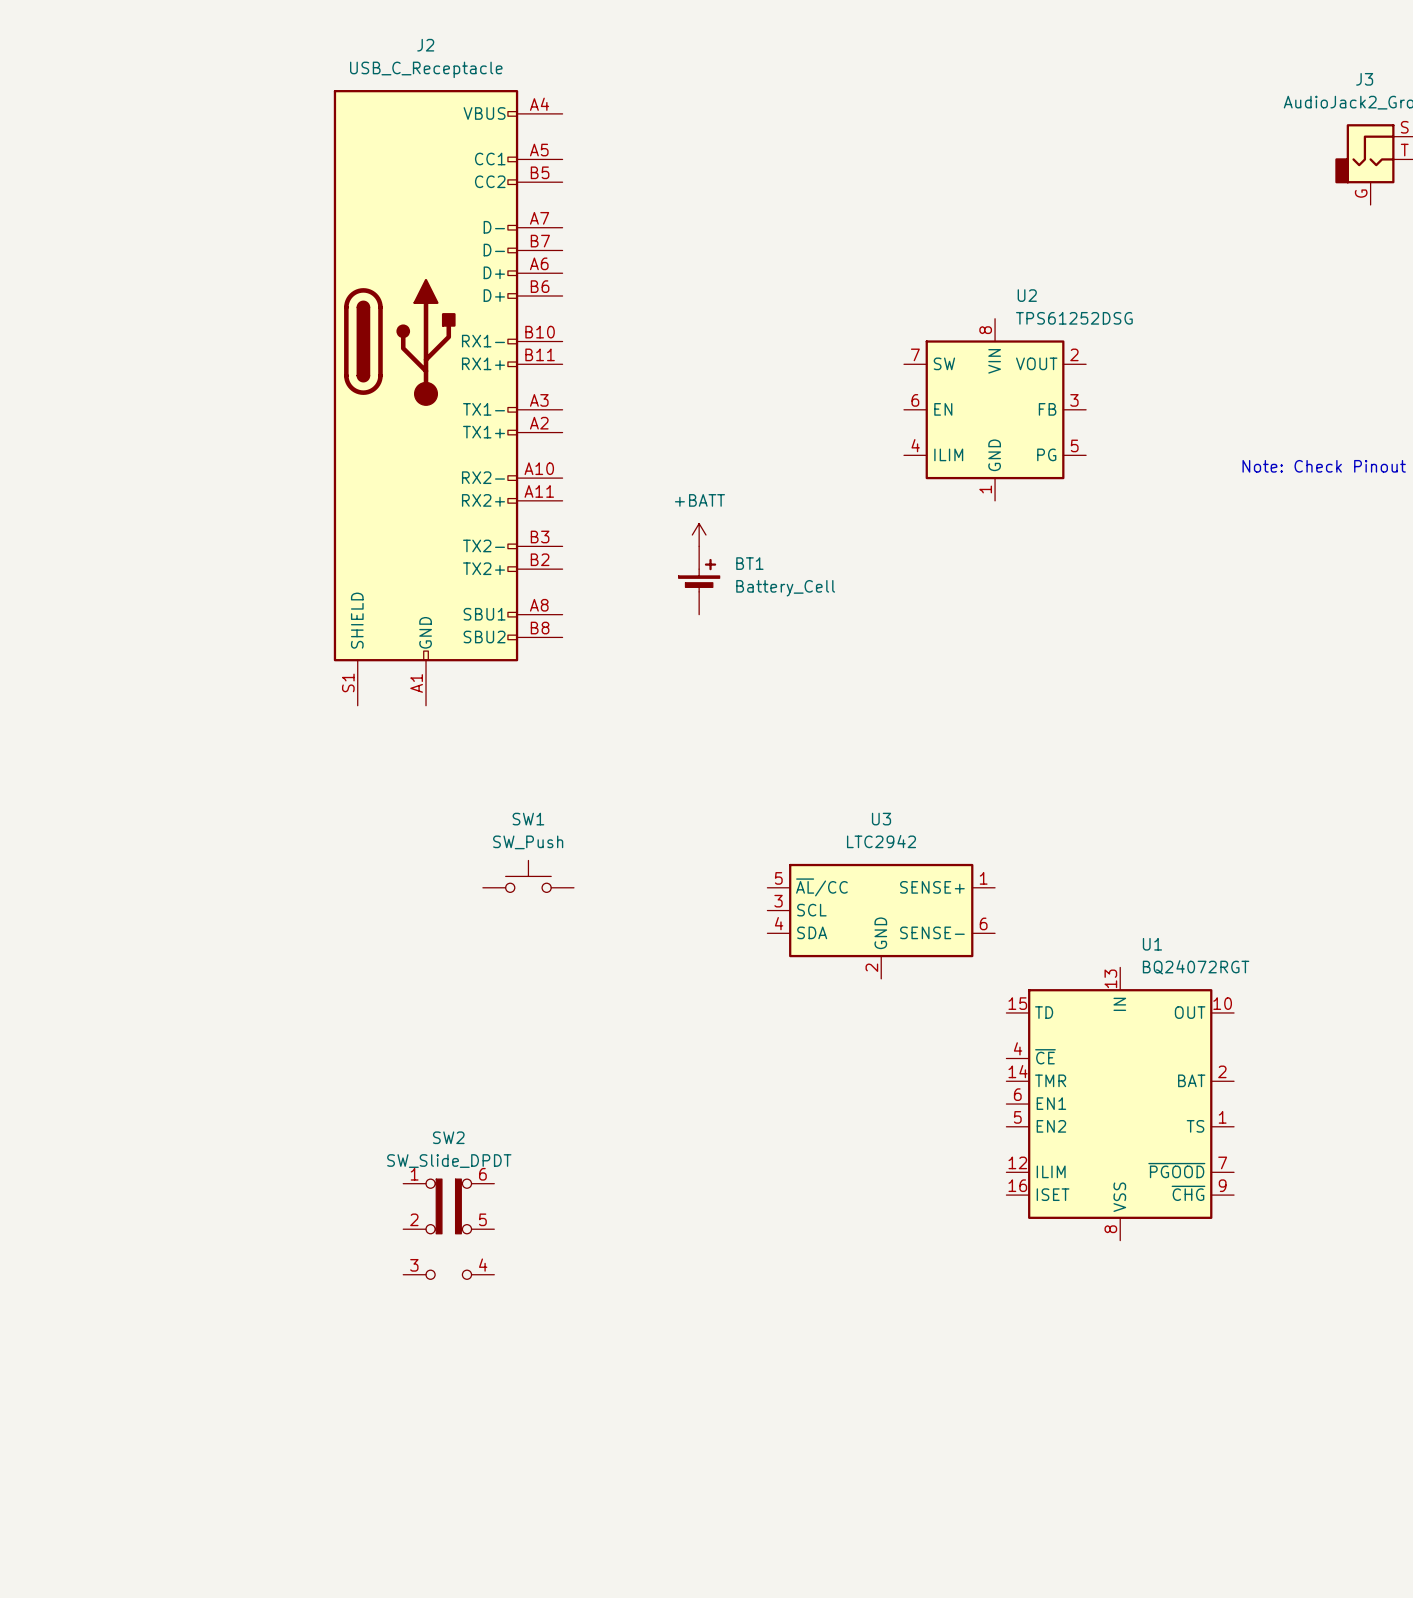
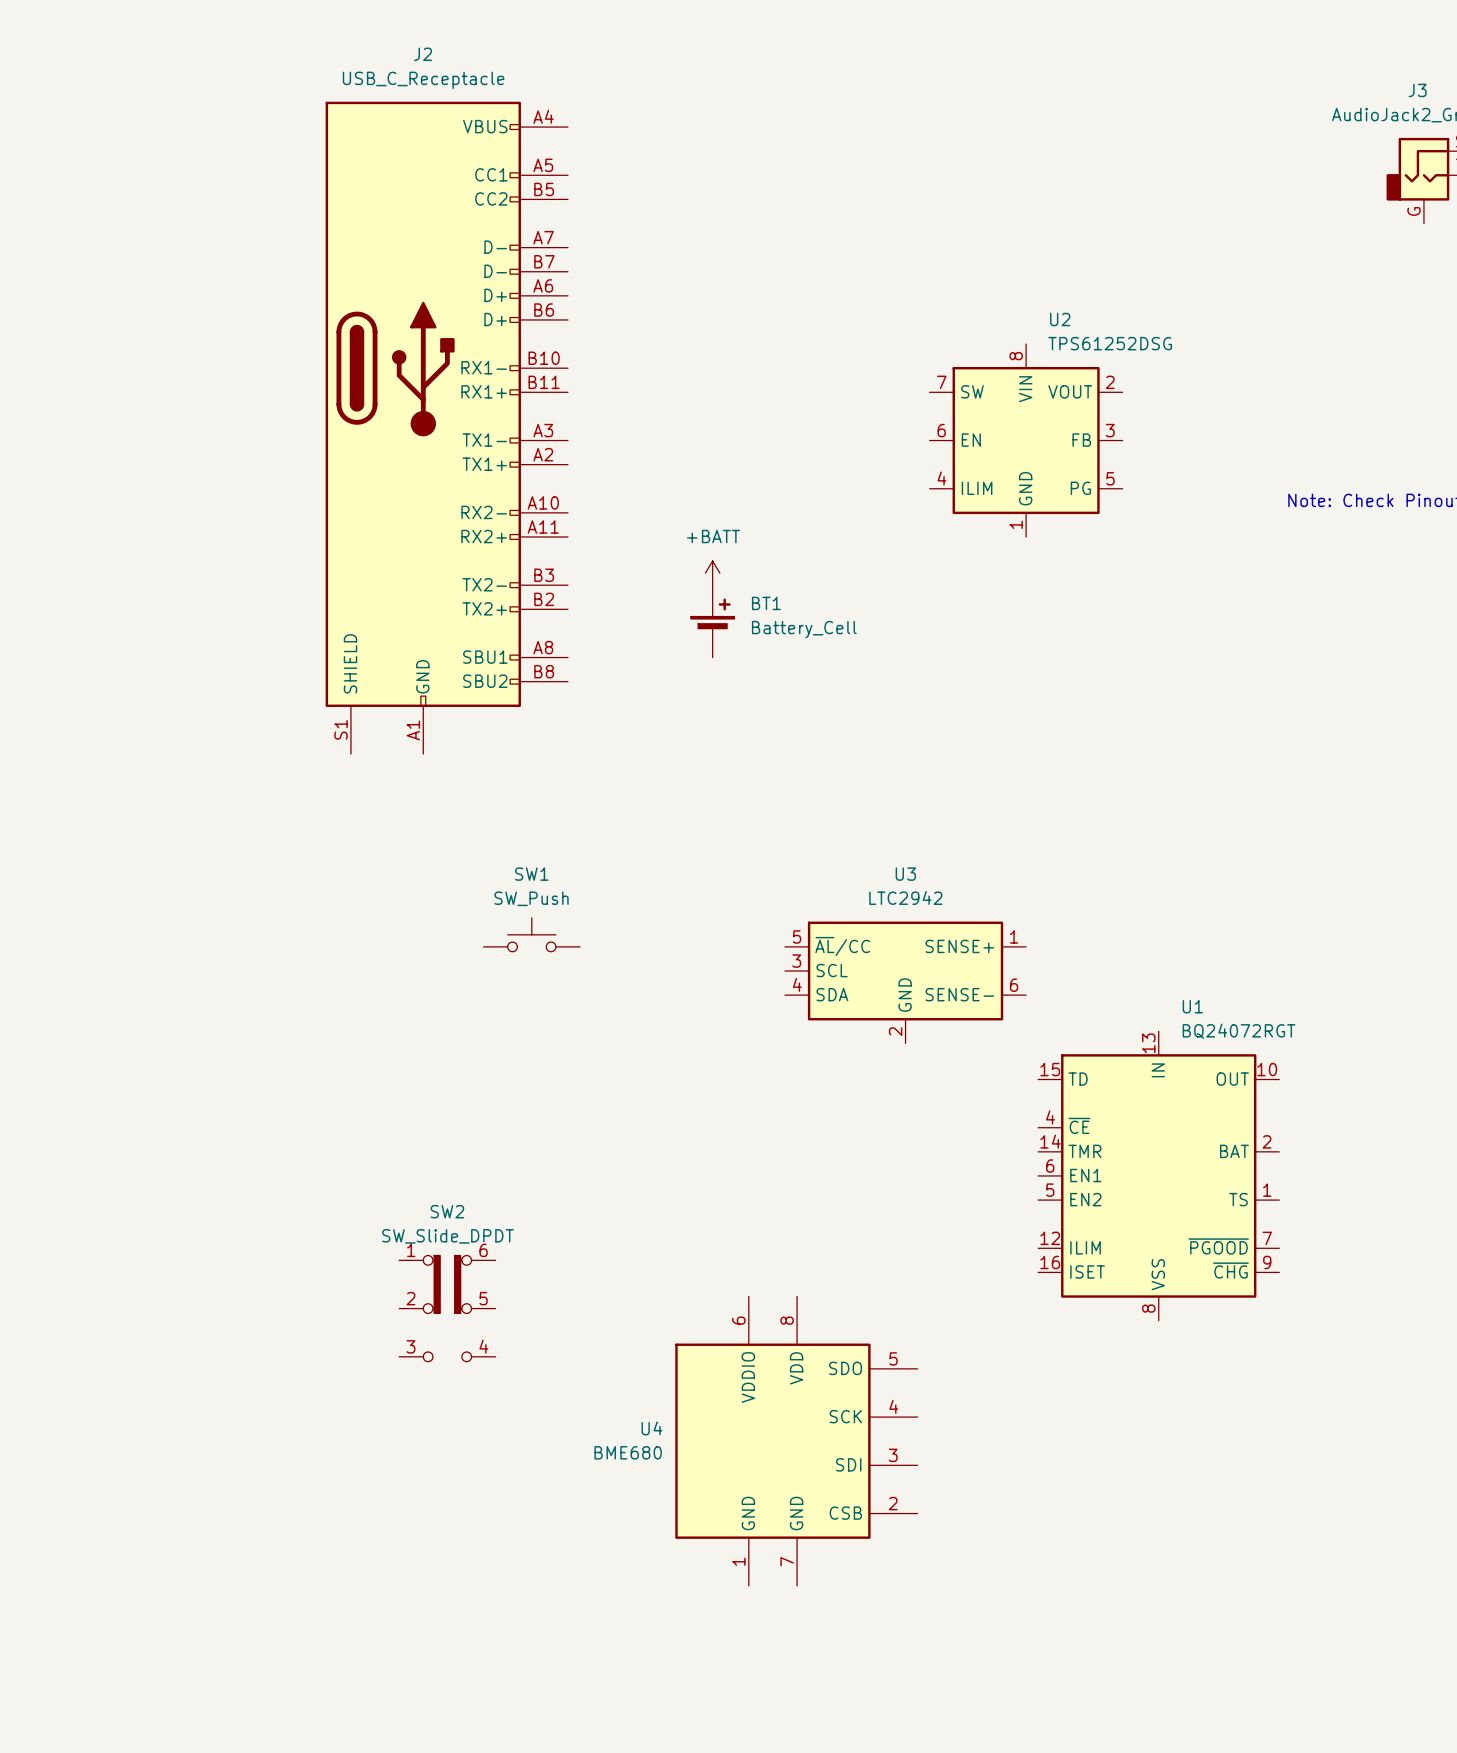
U4: none -> BME680 (796, 1441)

